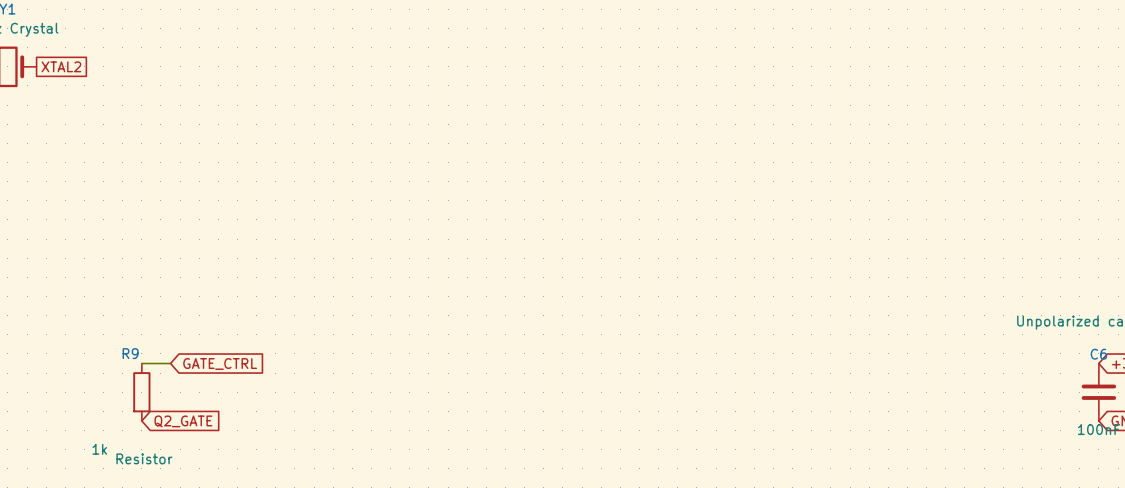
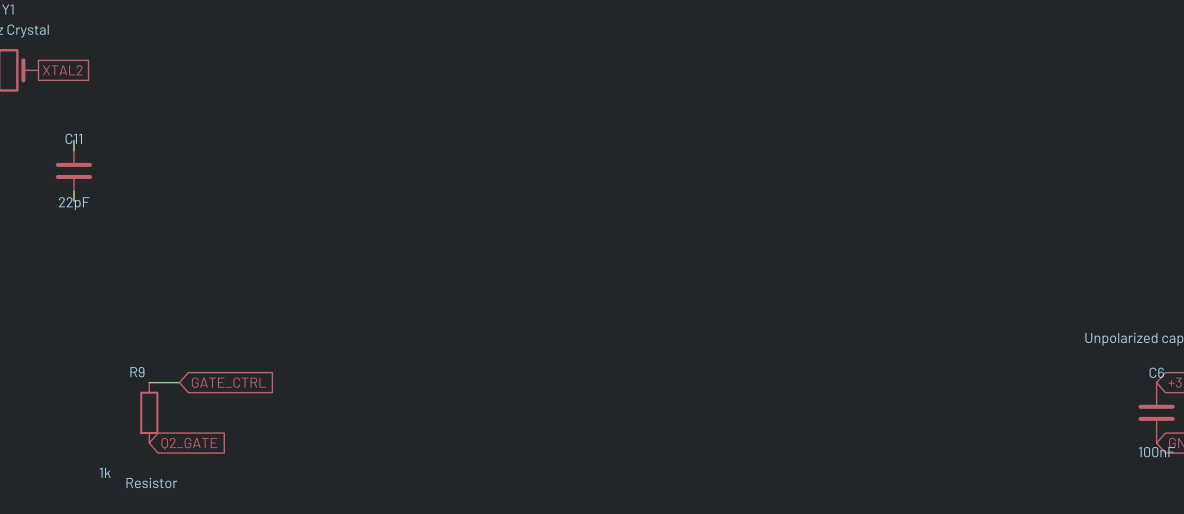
wire: none -> (73, 140) (73, 150)
C11: none -> 22pF (73, 170)
wire: none -> (73, 191) (73, 201)

